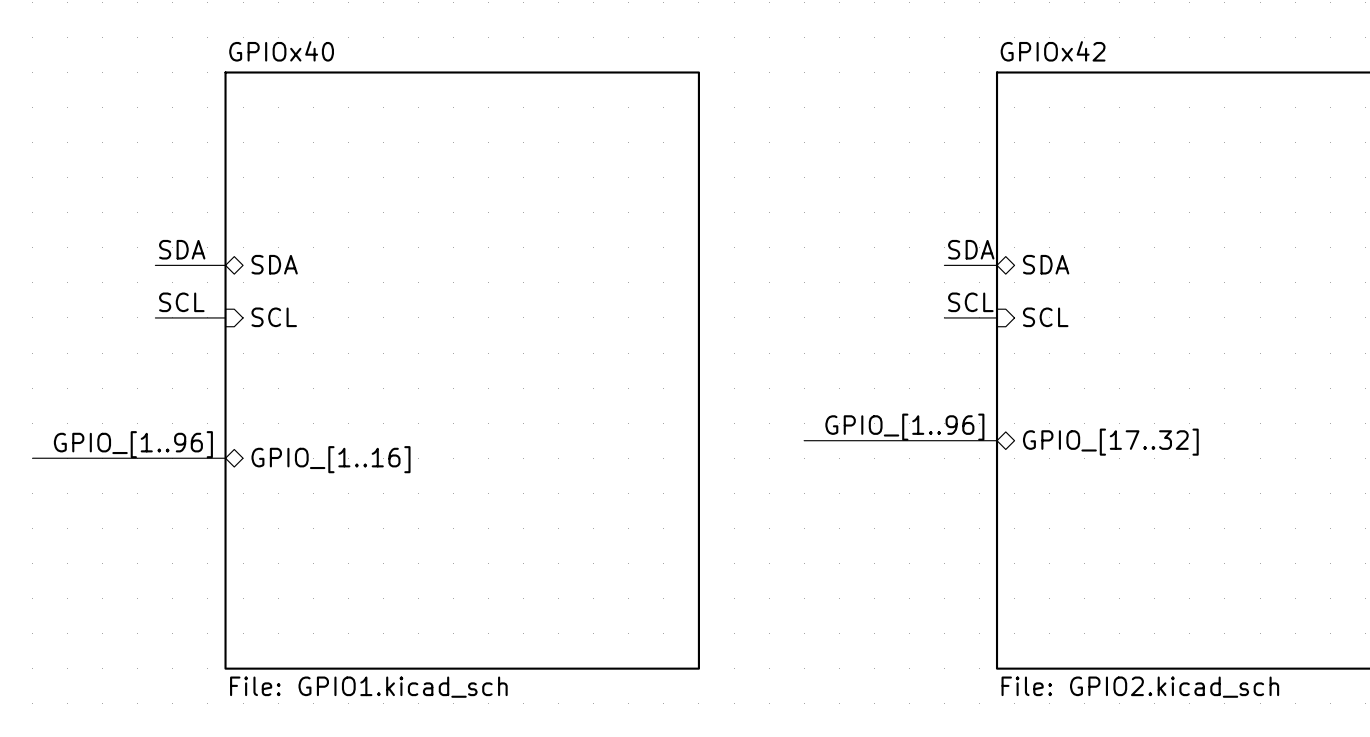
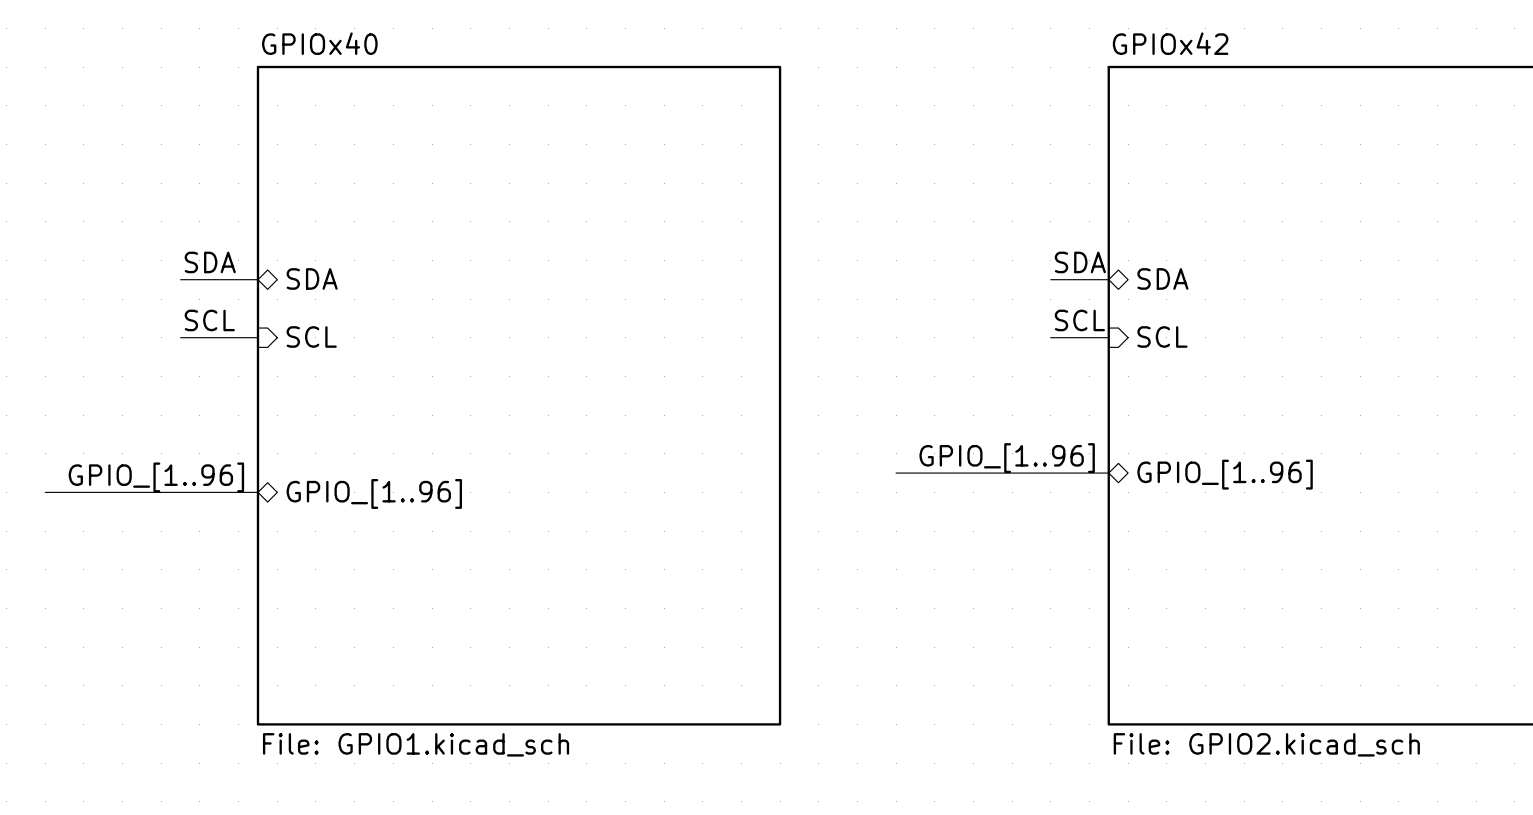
sheet pin: GPIO_[17..32] (1110, 442) -> GPIO_[1..96] (1225, 474)
sheet pin: GPIO_[1..16] (331, 459) -> GPIO_[1..96] (374, 493)

